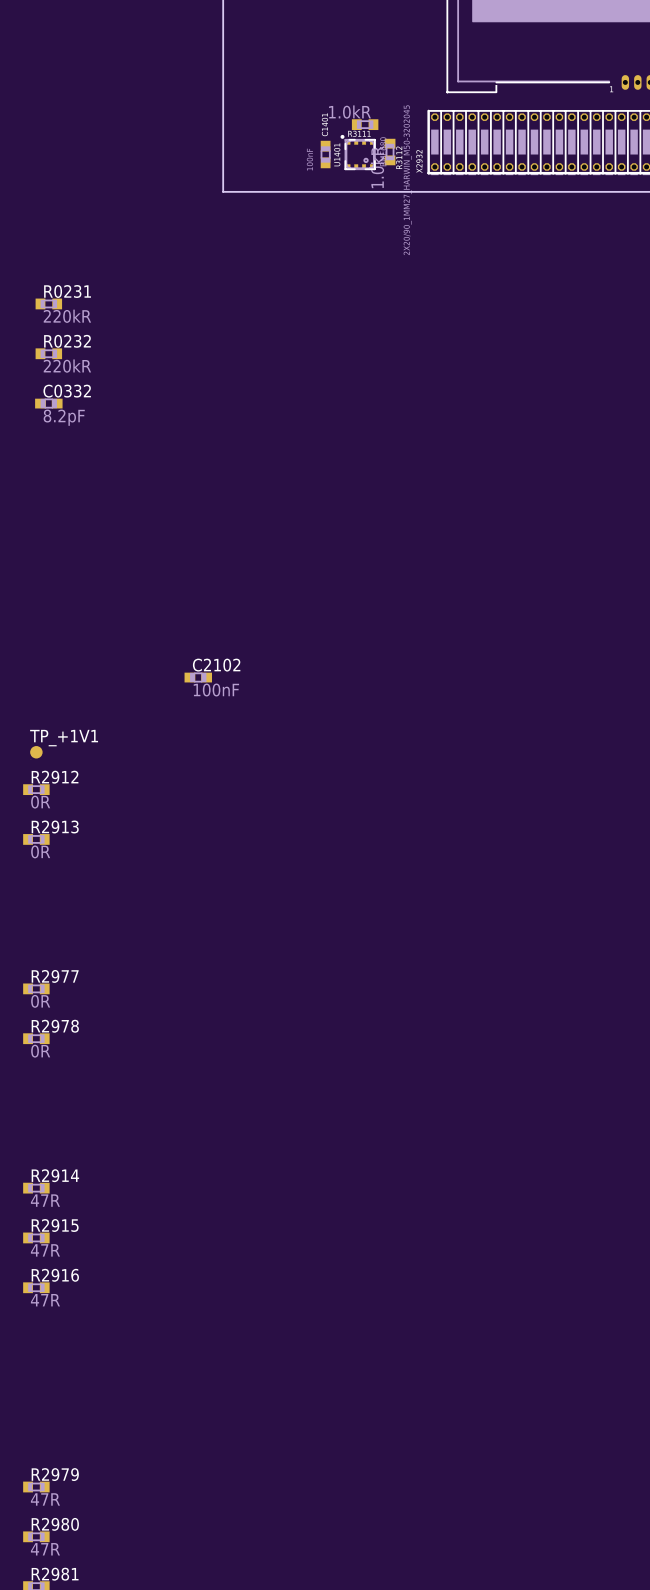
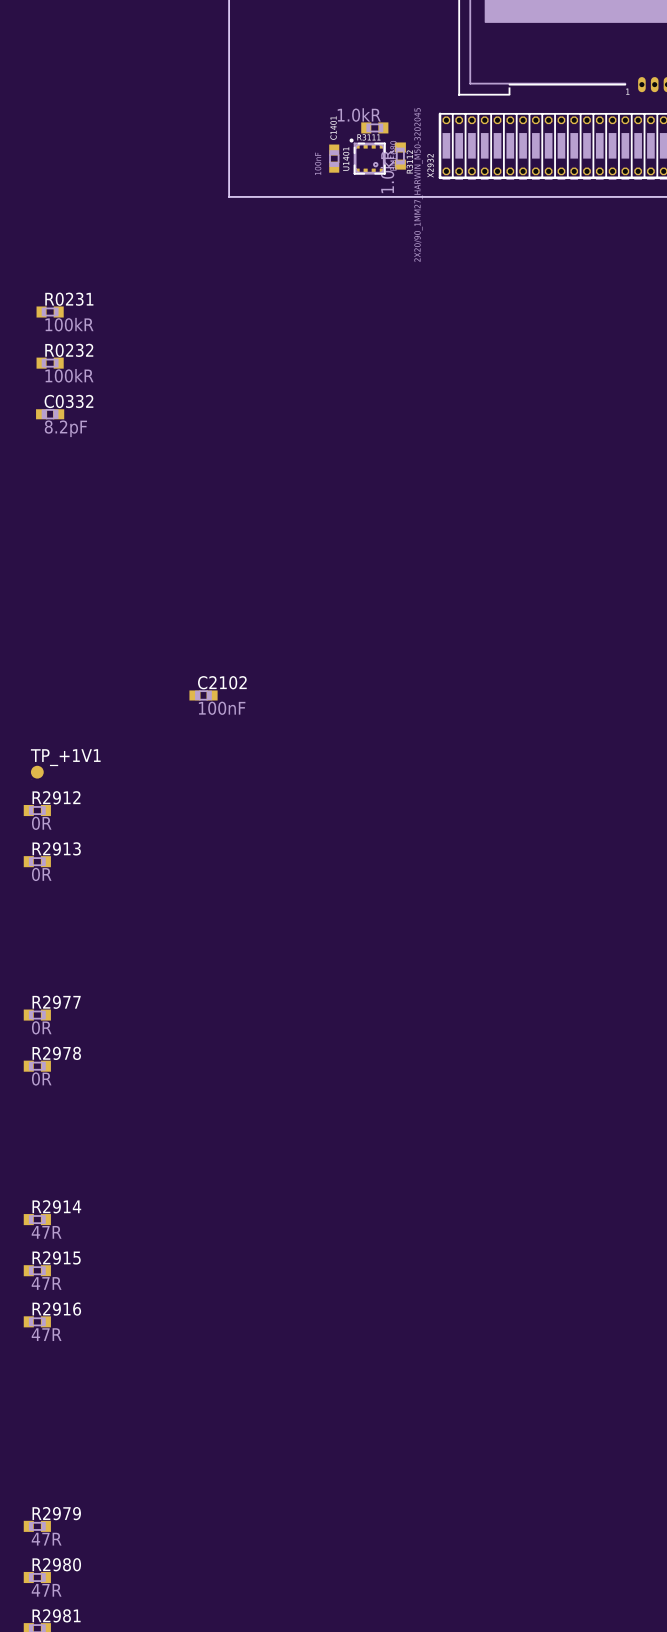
R0231 value: 220kR (67, 316) -> 100kR (69, 324)
R0232 value: 220kR (67, 366) -> 100kR (69, 375)

